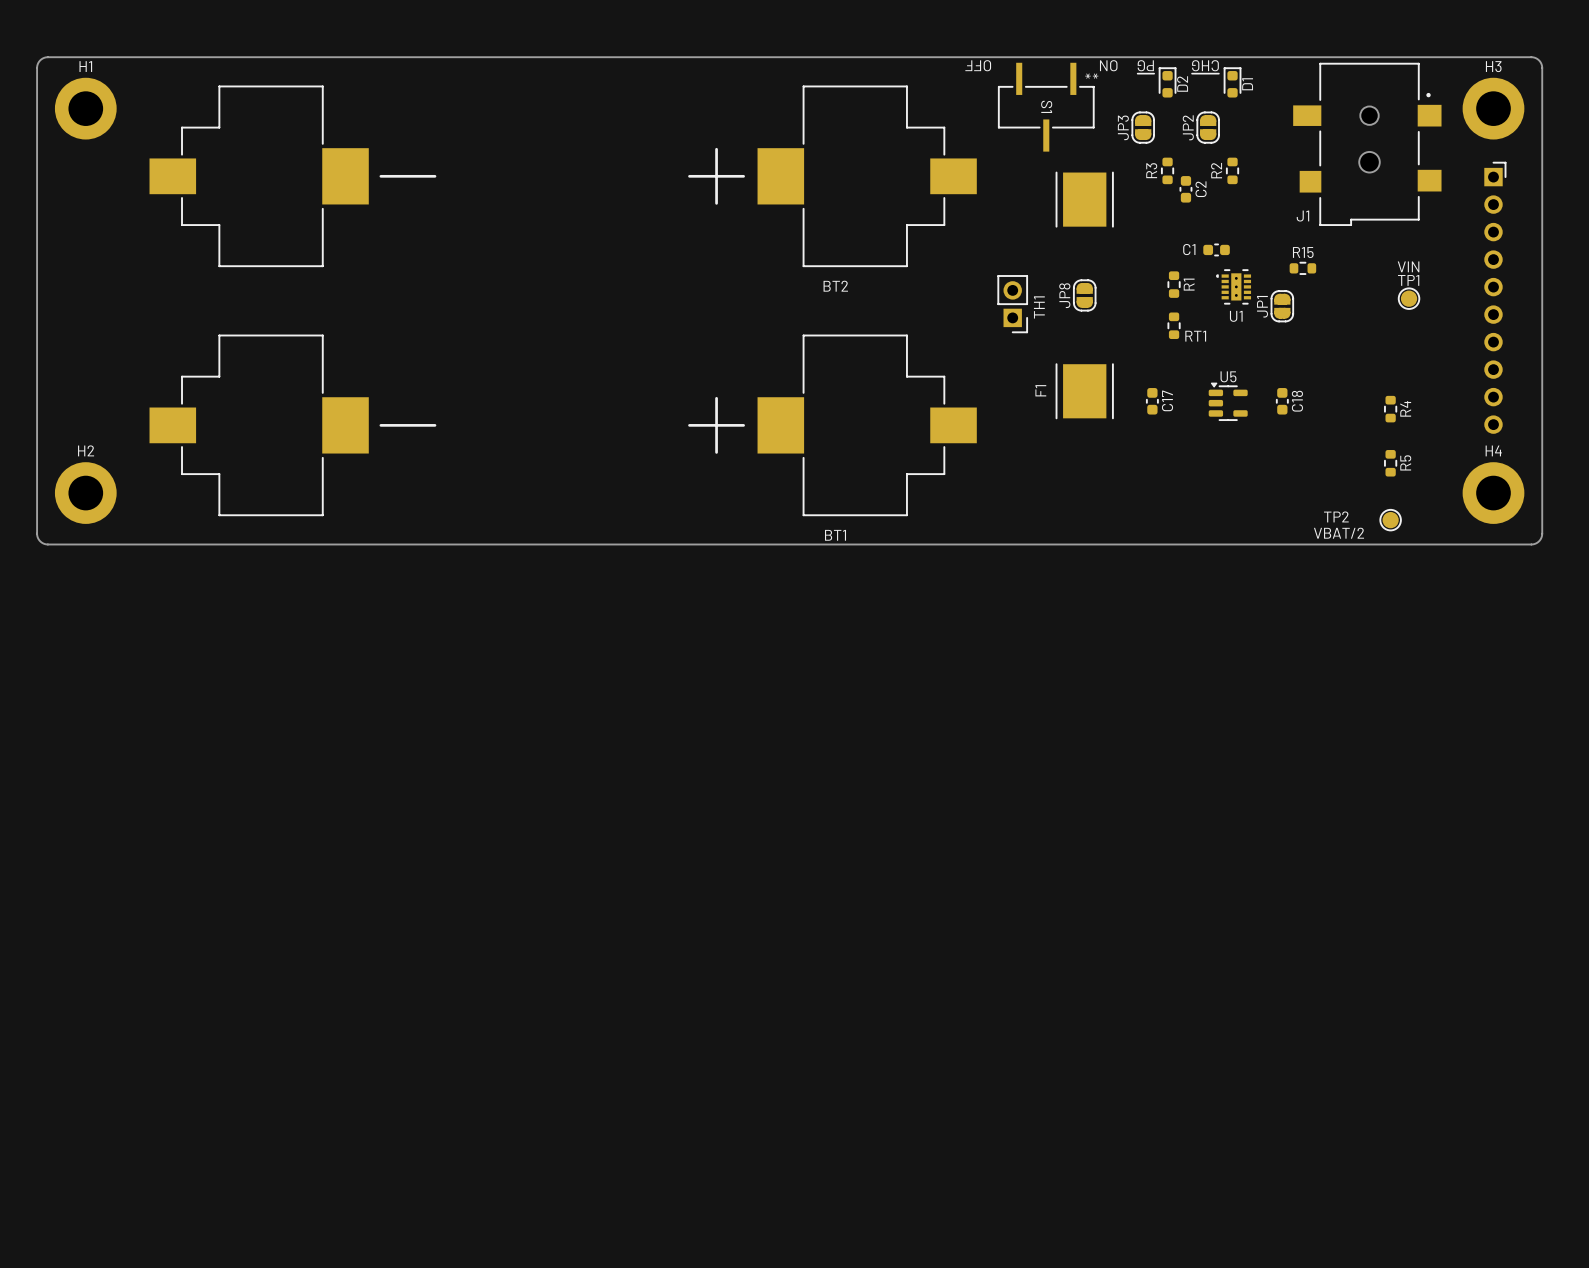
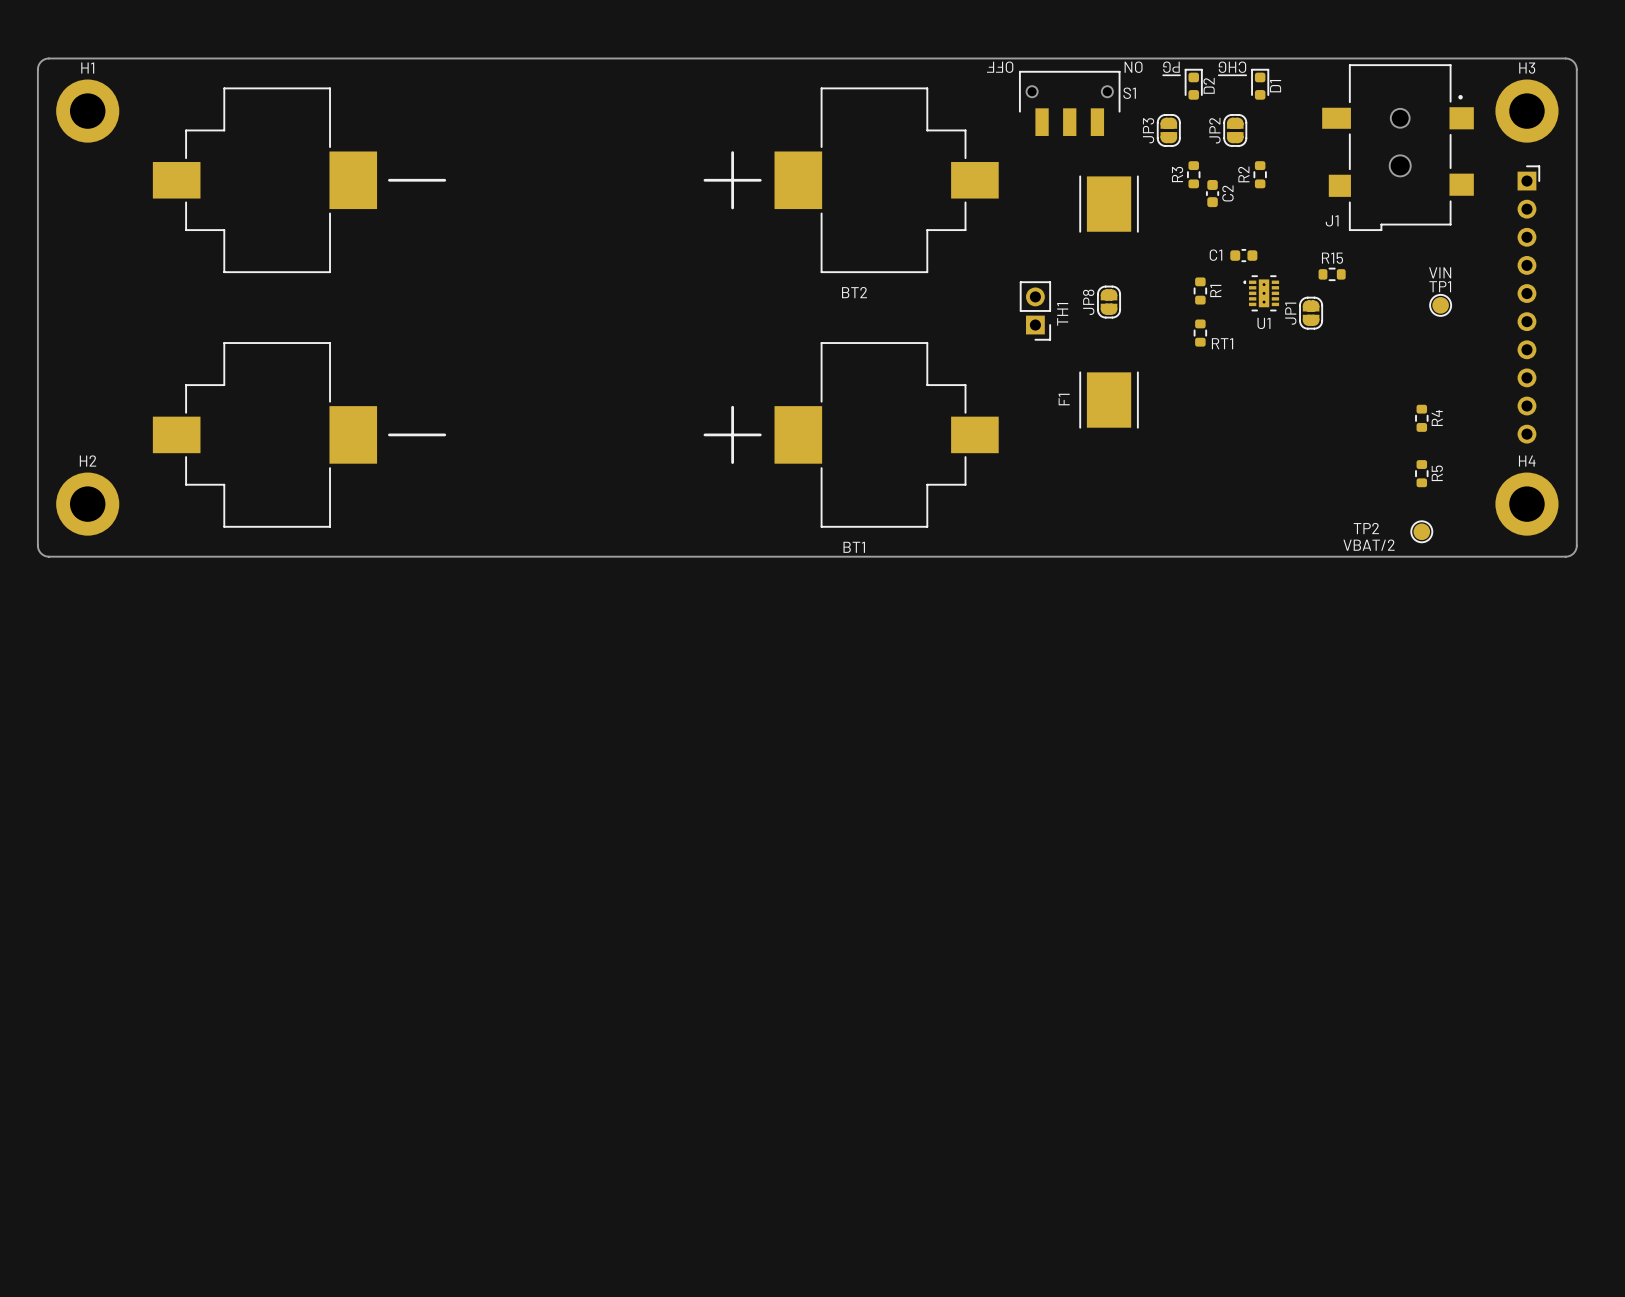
S1 footprint: [998, 62, 1095, 152] -> [1019, 71, 1121, 136]
S1 name position: S1 (1046, 106) -> S1 (1129, 93)
C17: (1152, 401) -> none
U5: (1228, 401) -> none
C18: (1282, 401) -> none

